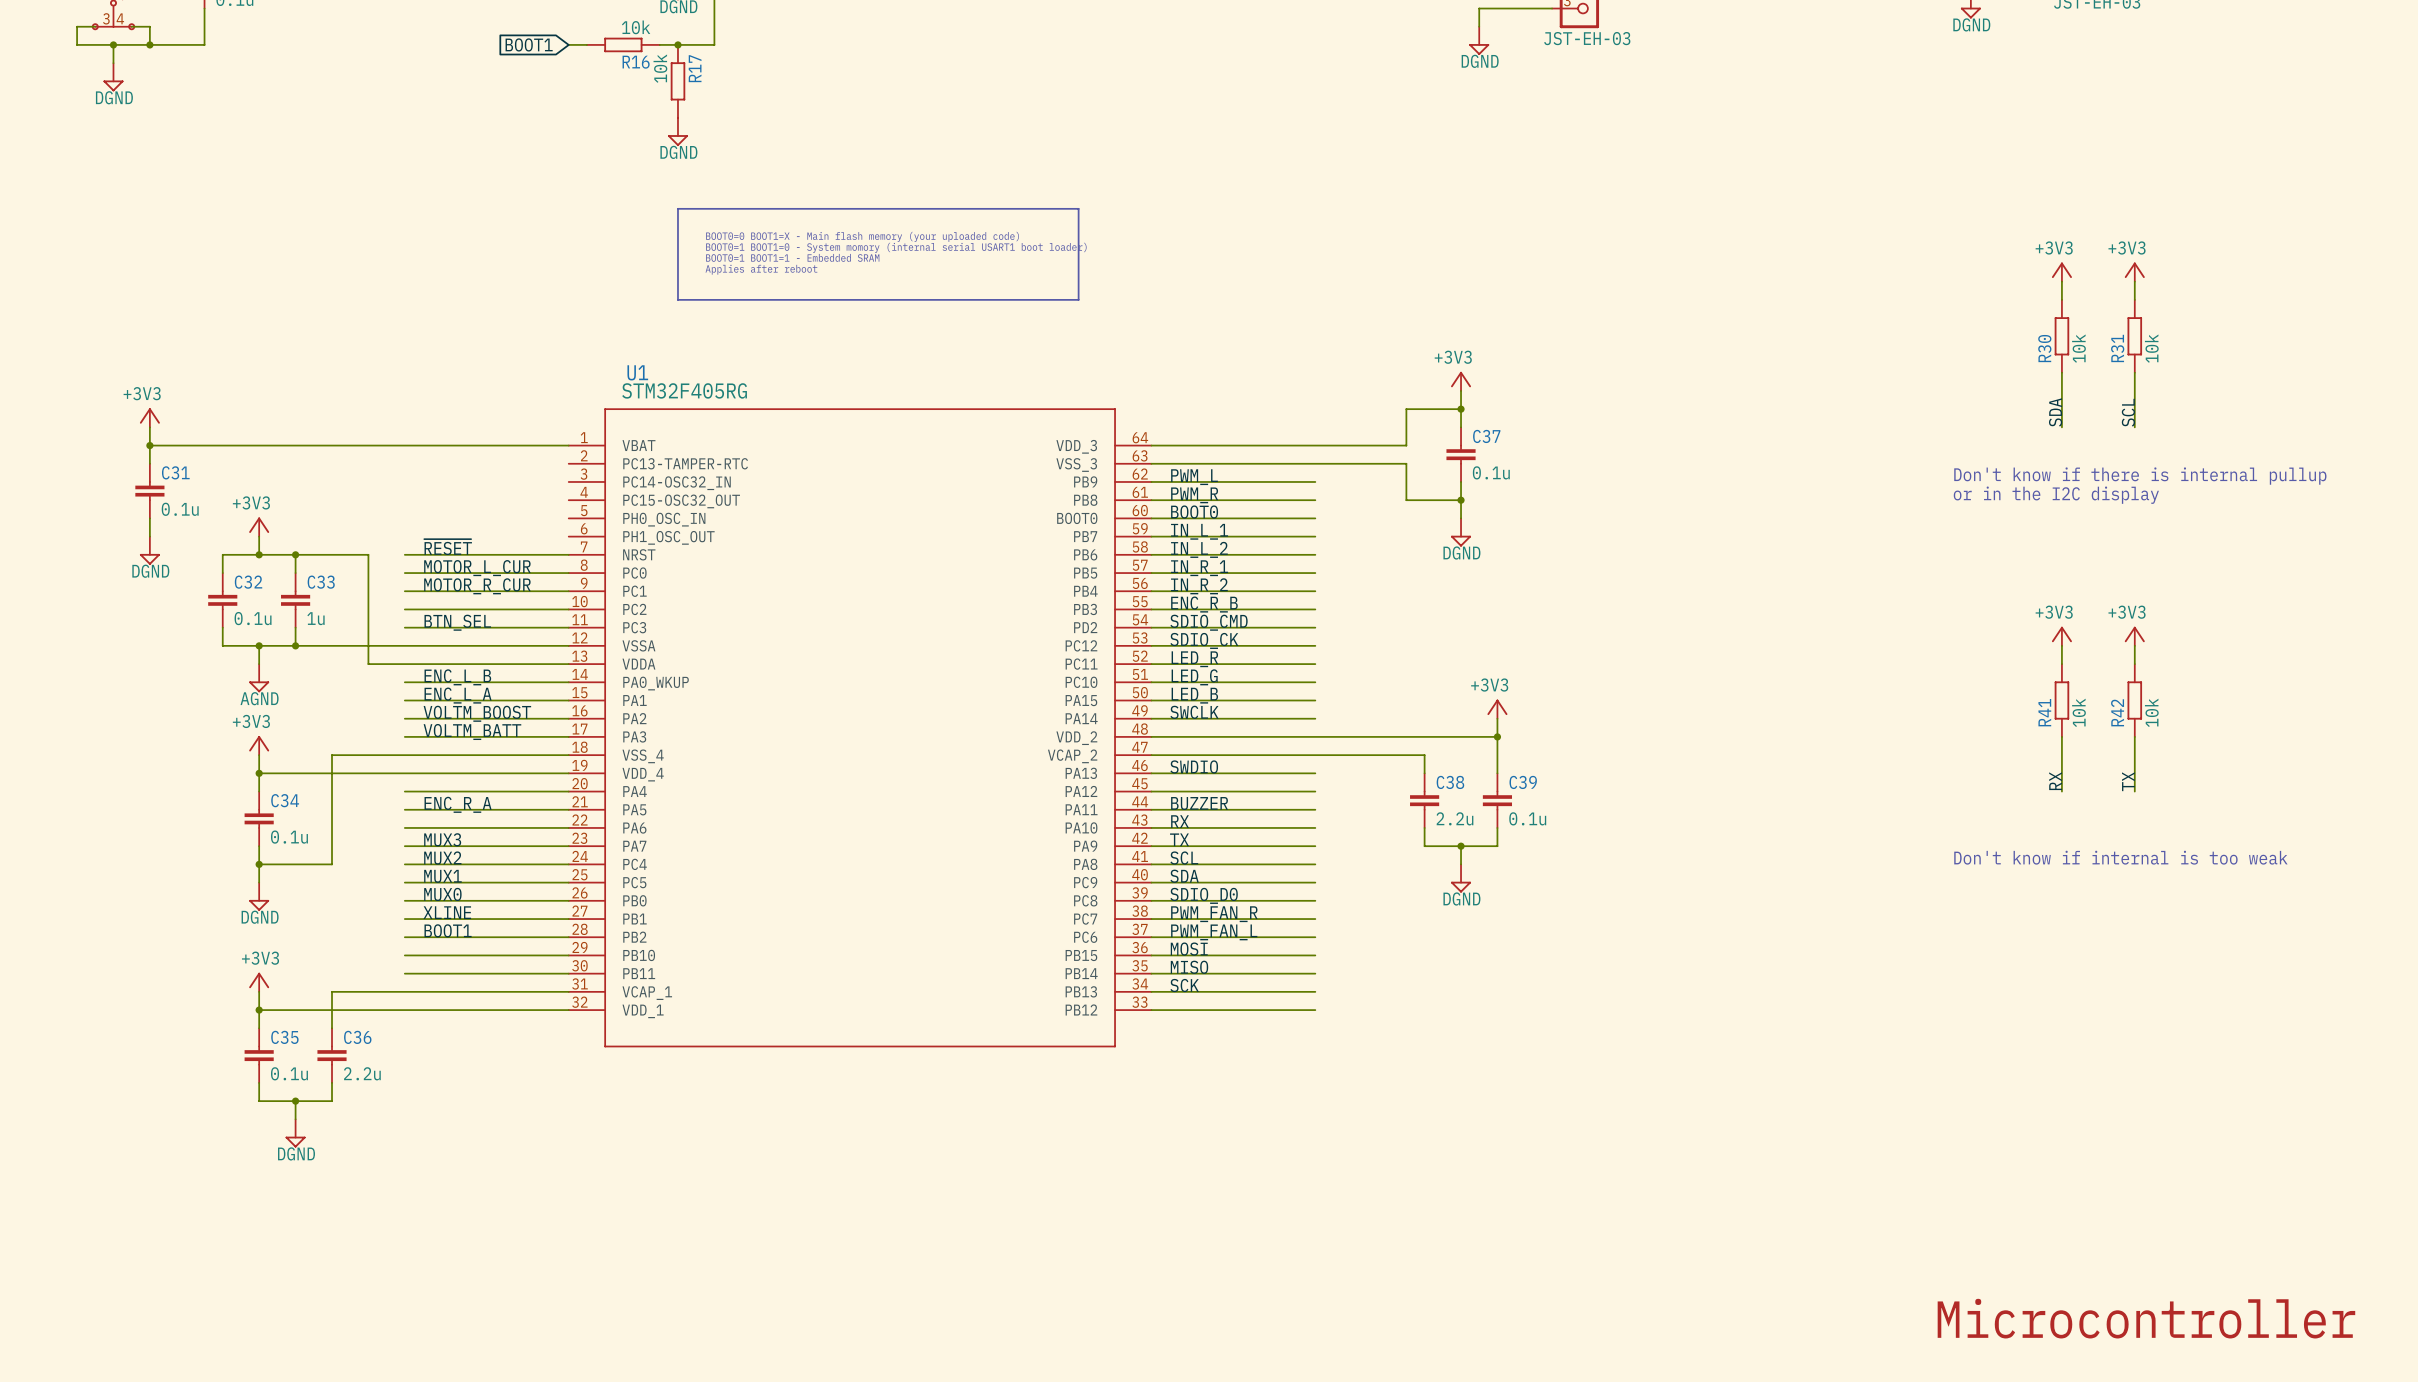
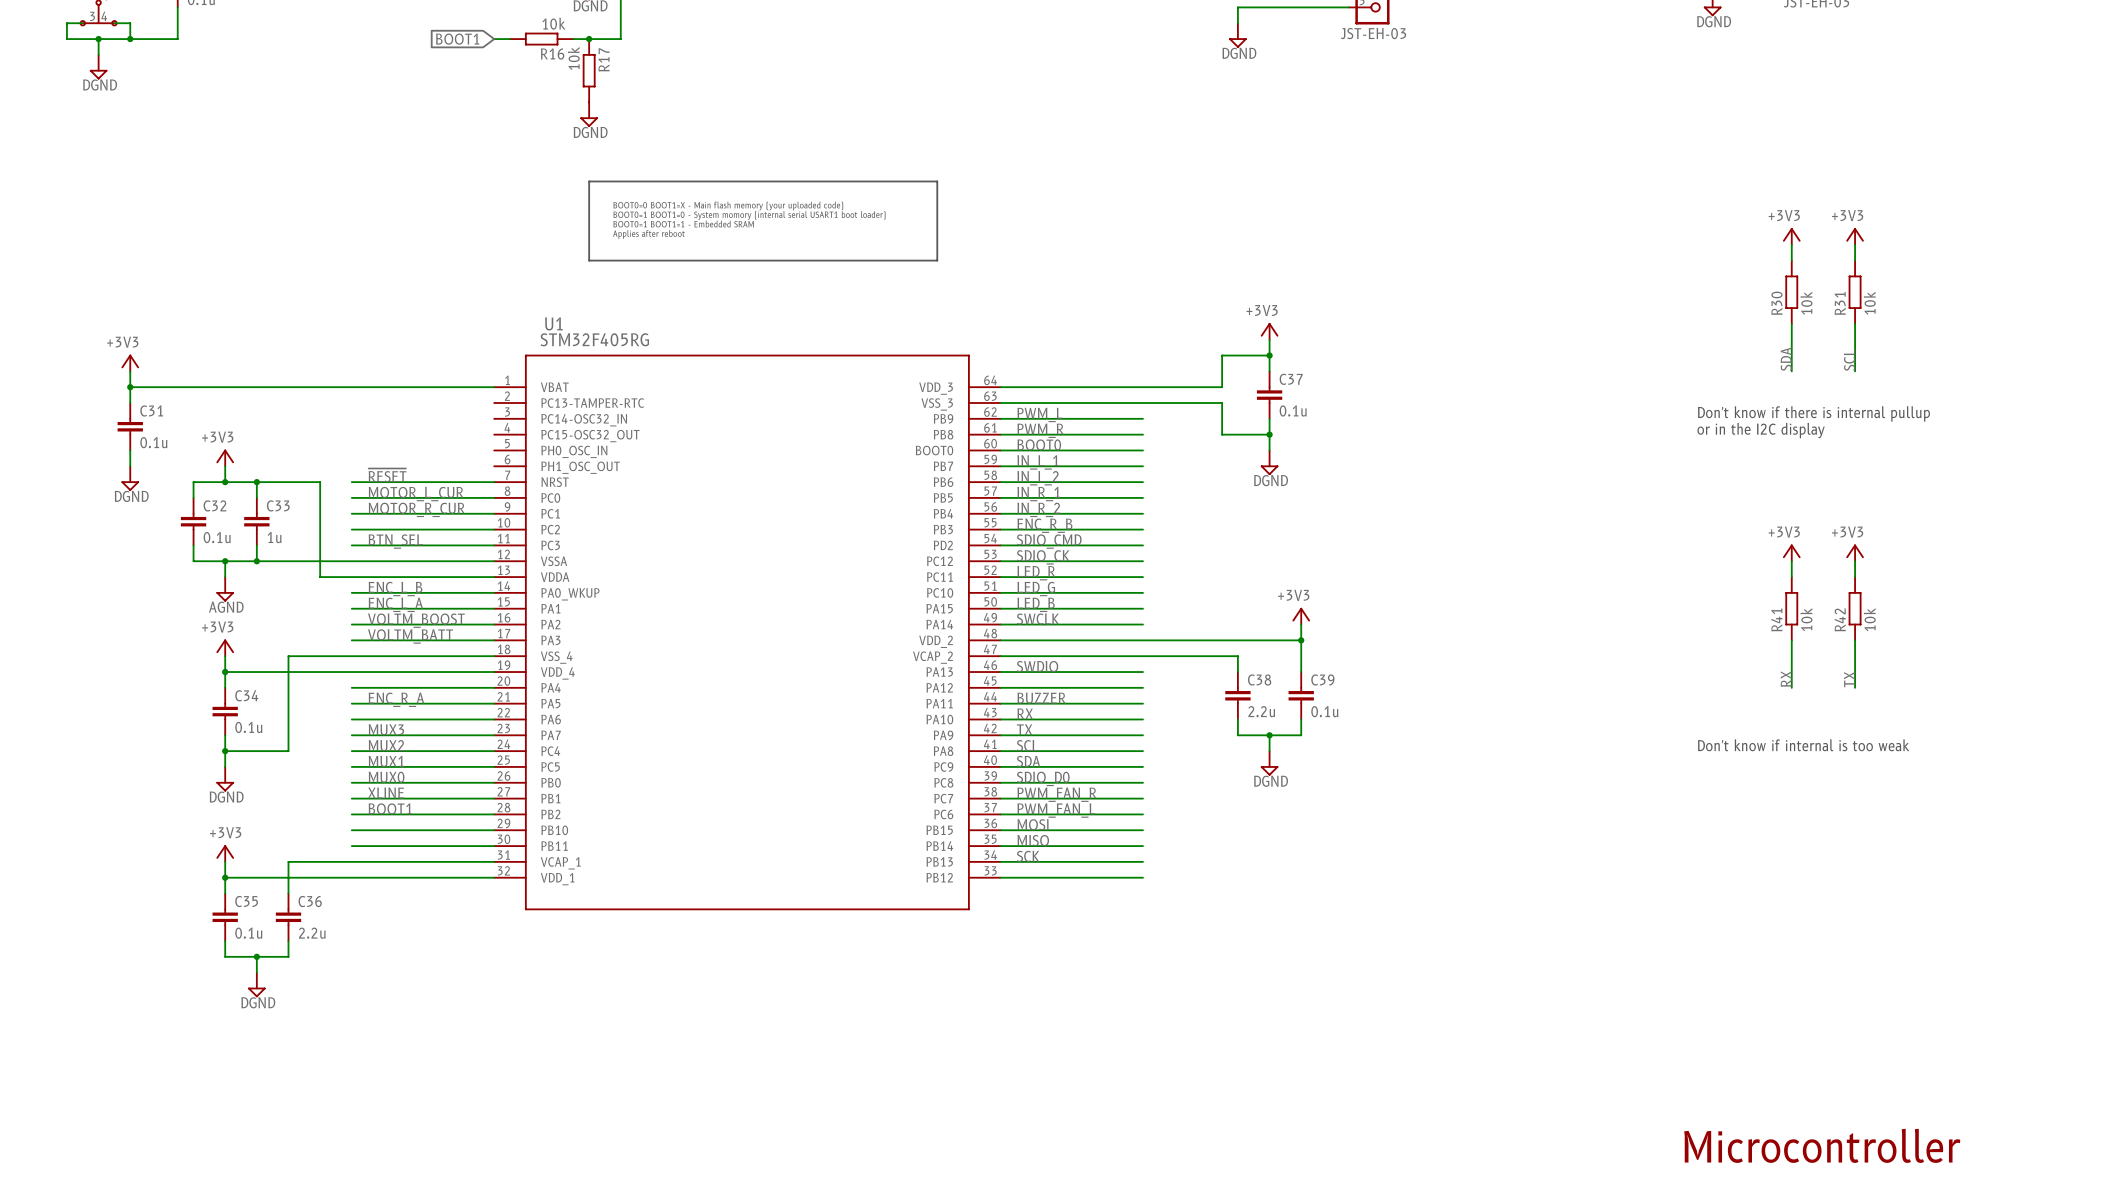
wire: (1479, 8) (1479, 26) -> (1285, 7) (1237, 7) (1237, 23)
power symbol position: DGND (1479, 40) -> DGND (1237, 35)

